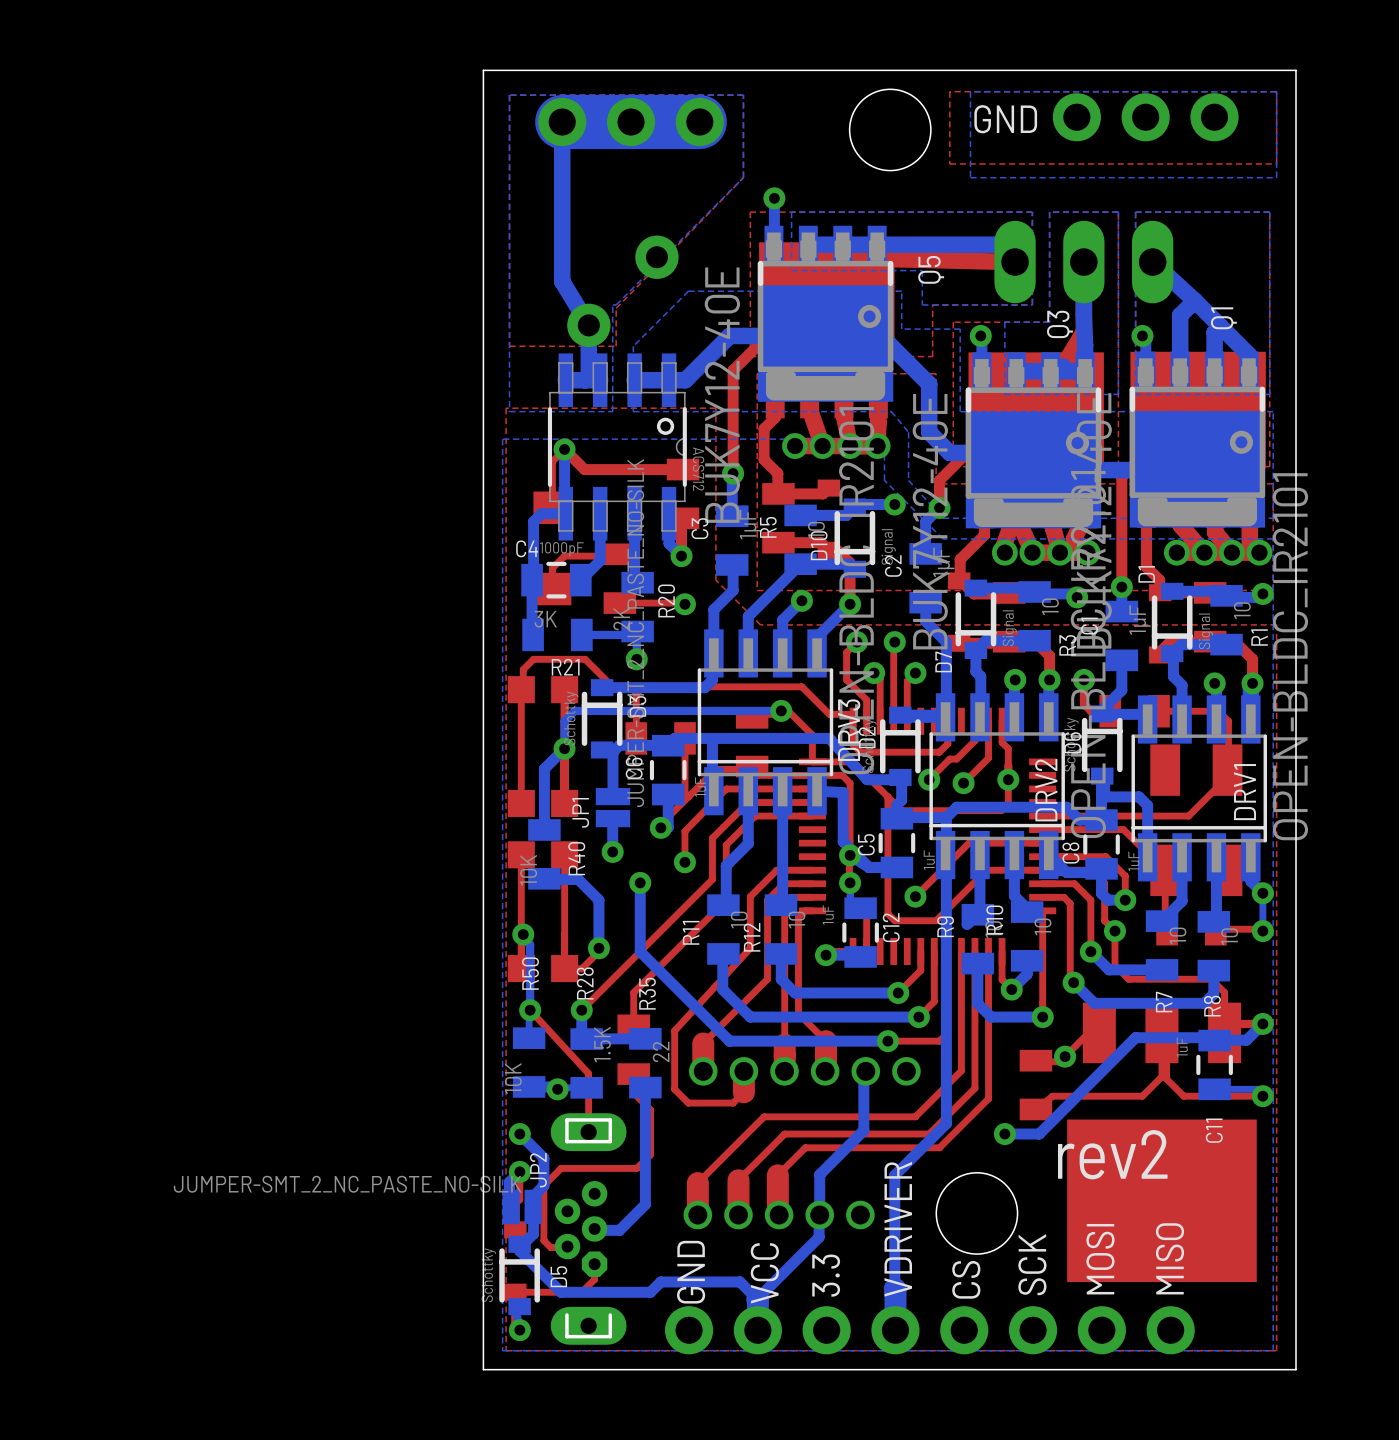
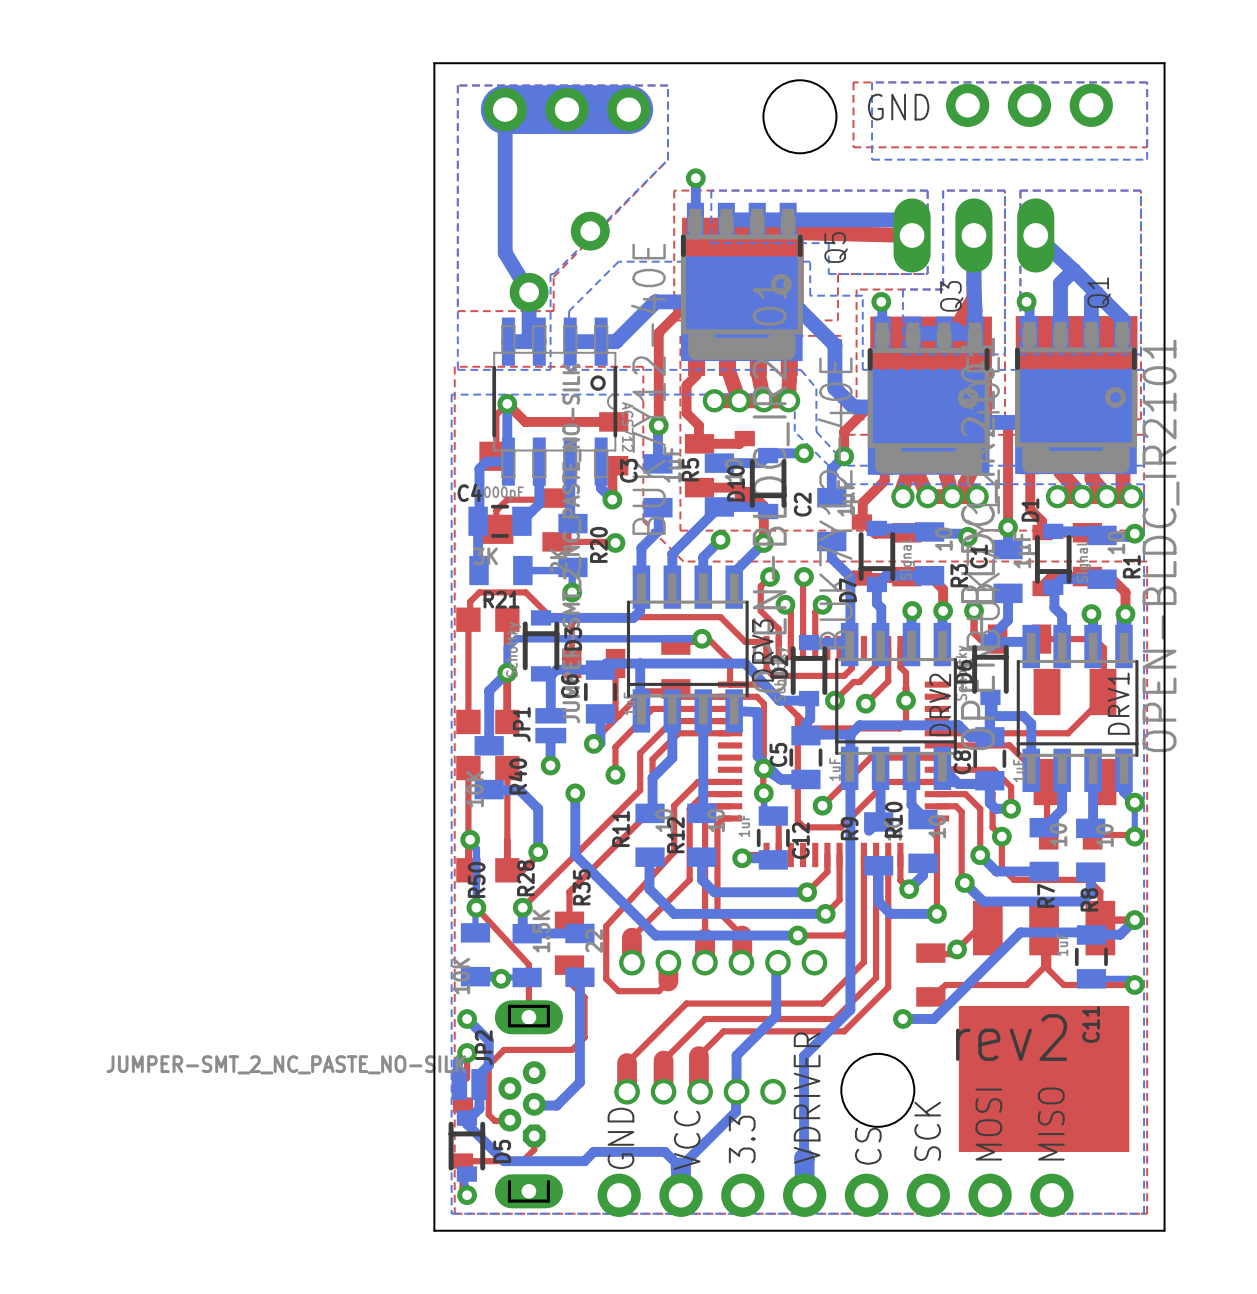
D10 value: Signal (888, 547) -> none
D5 value: Schottky (488, 1275) -> none

